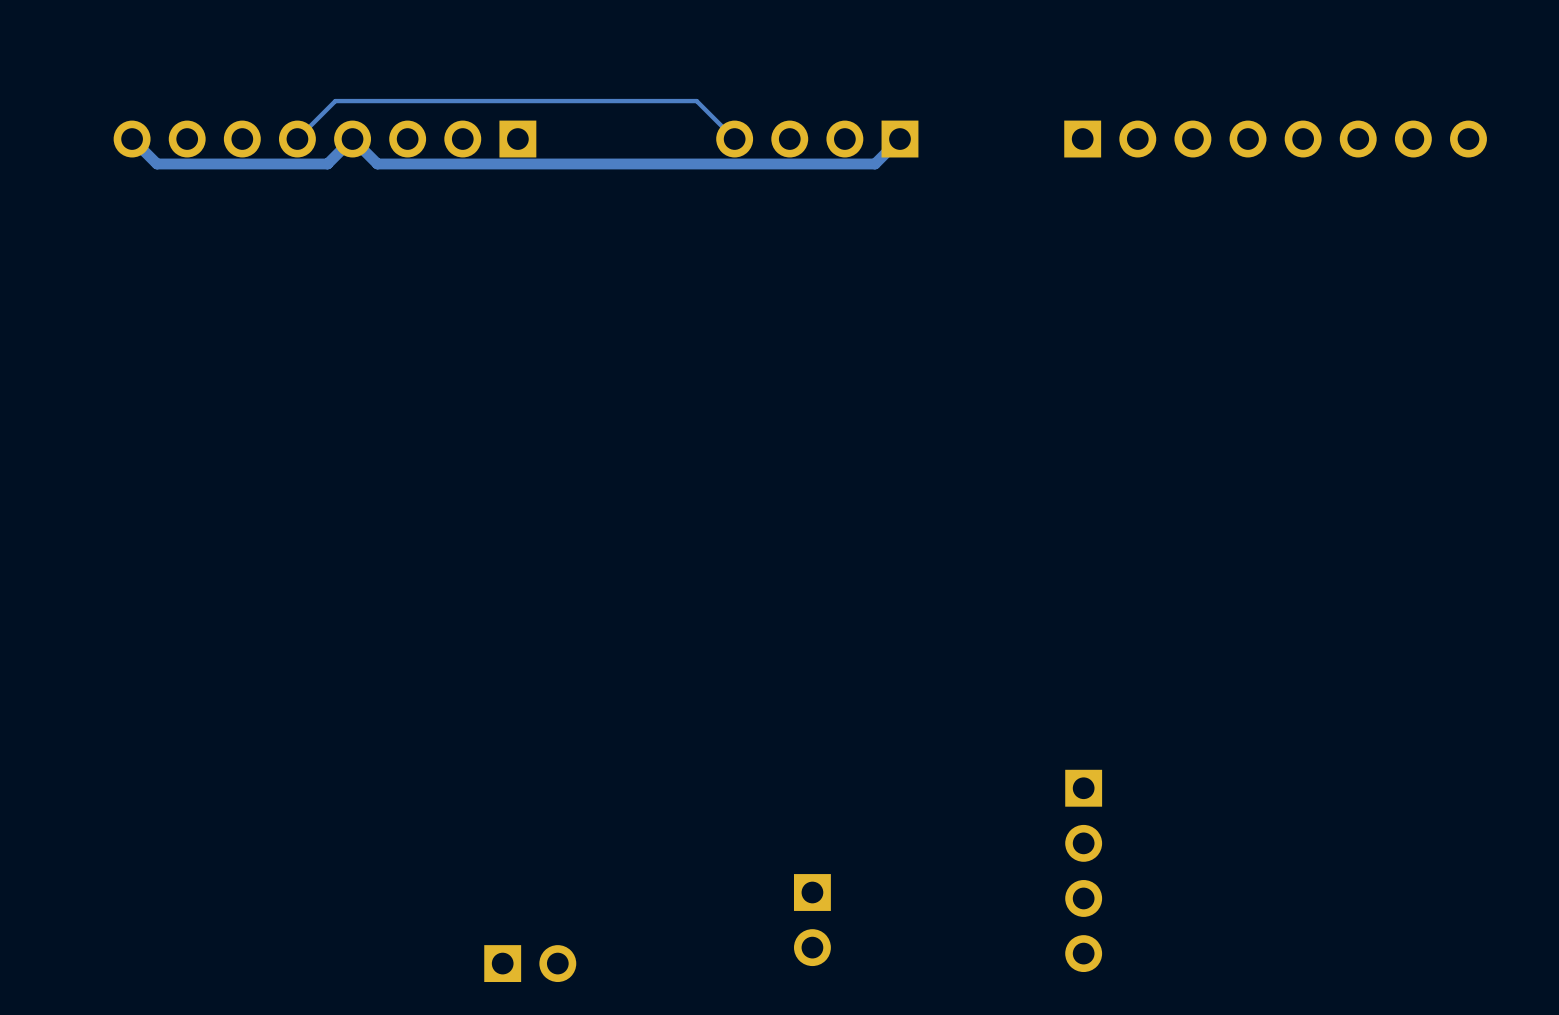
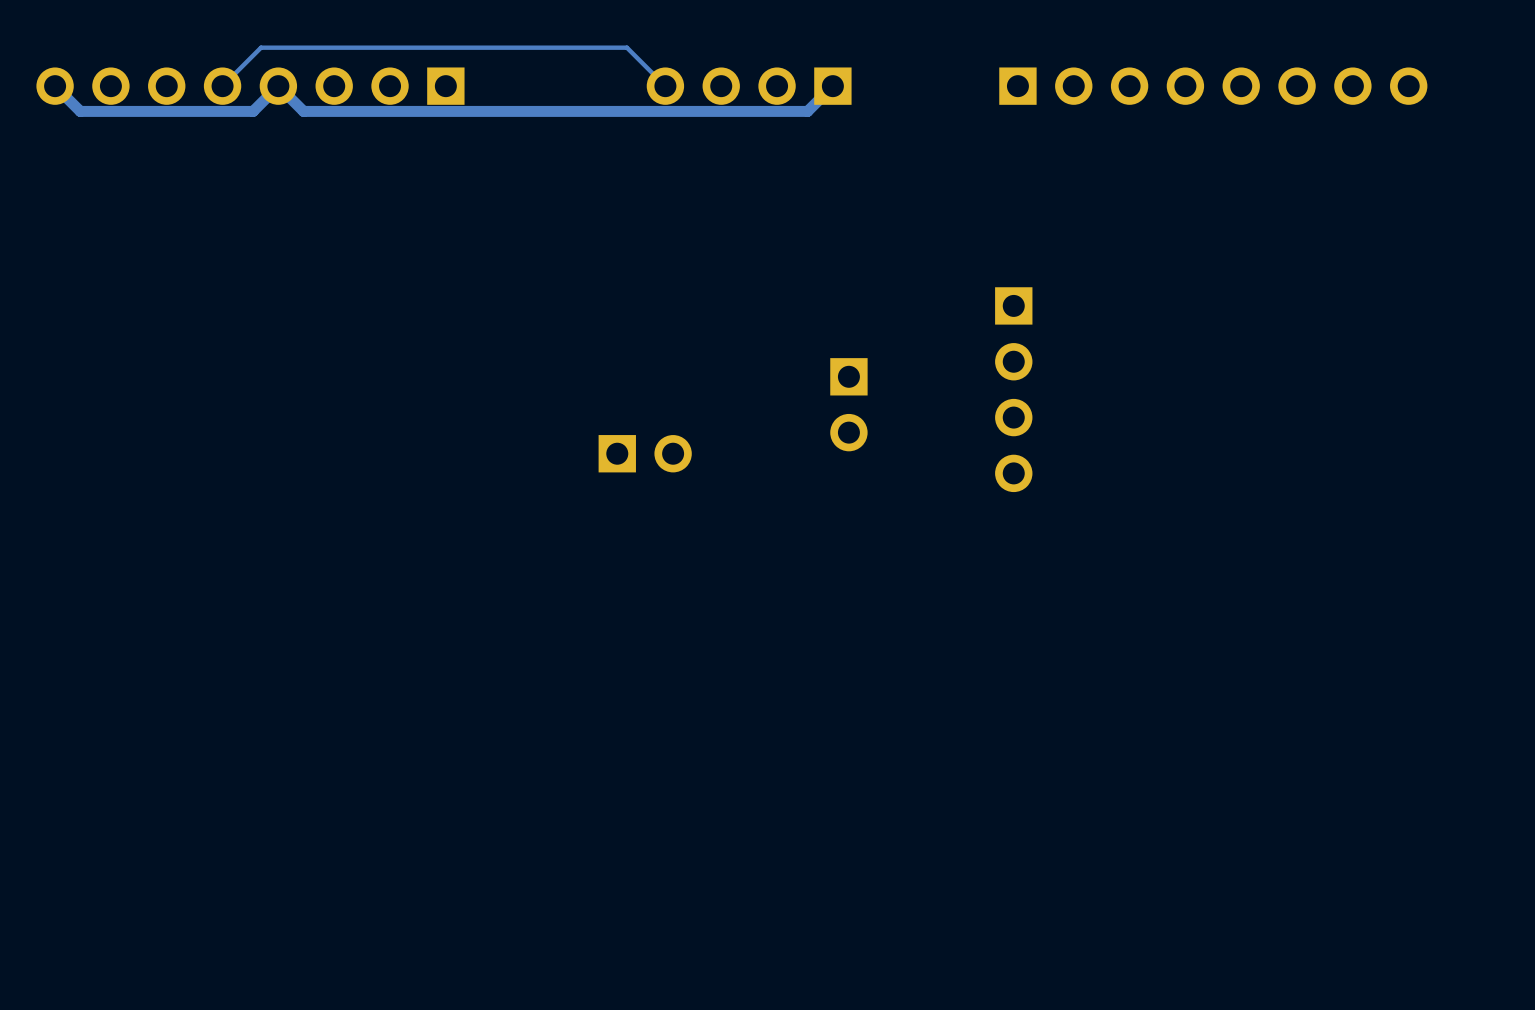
part: none -> (848, 404)
part: none -> (645, 453)
part position: (1083, 870) -> (1013, 389)
part: (812, 920) -> none
part: (530, 963) -> none

